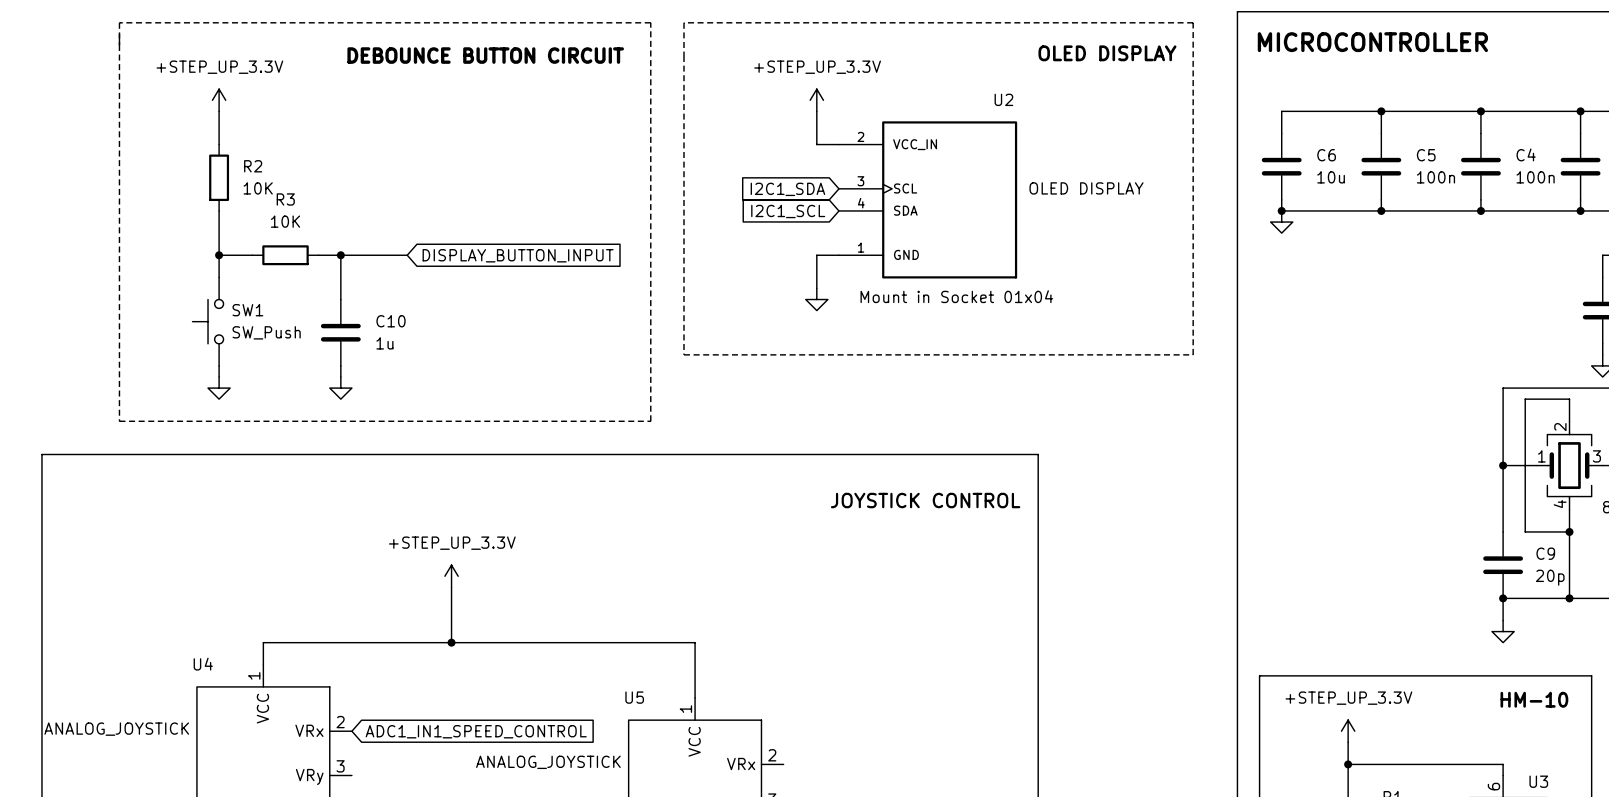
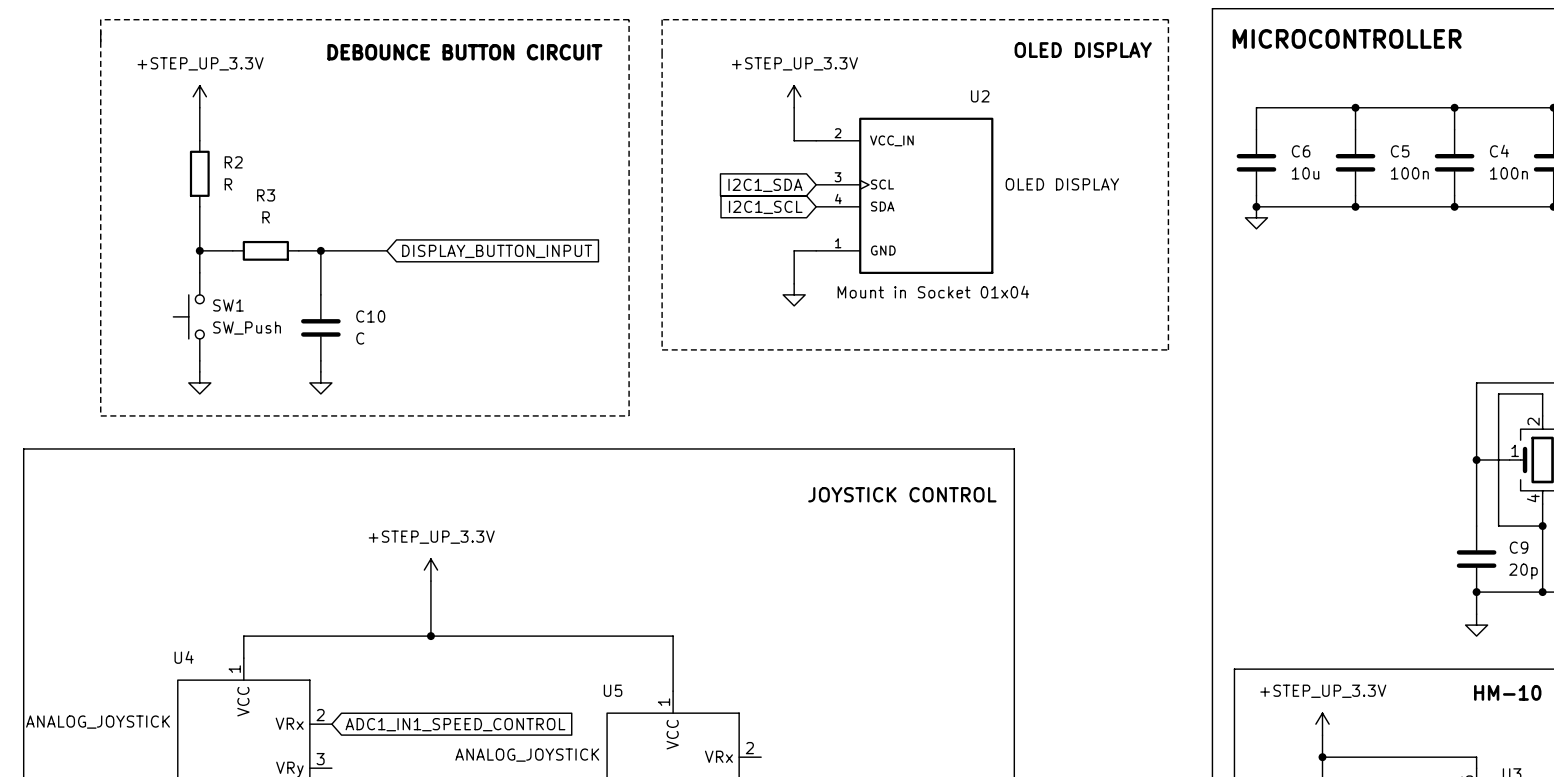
R2 value: 10K (258, 188) -> R (228, 184)
R3 value: 10K (285, 221) -> R (266, 217)
C10 value: 1u (384, 343) -> C (360, 338)

